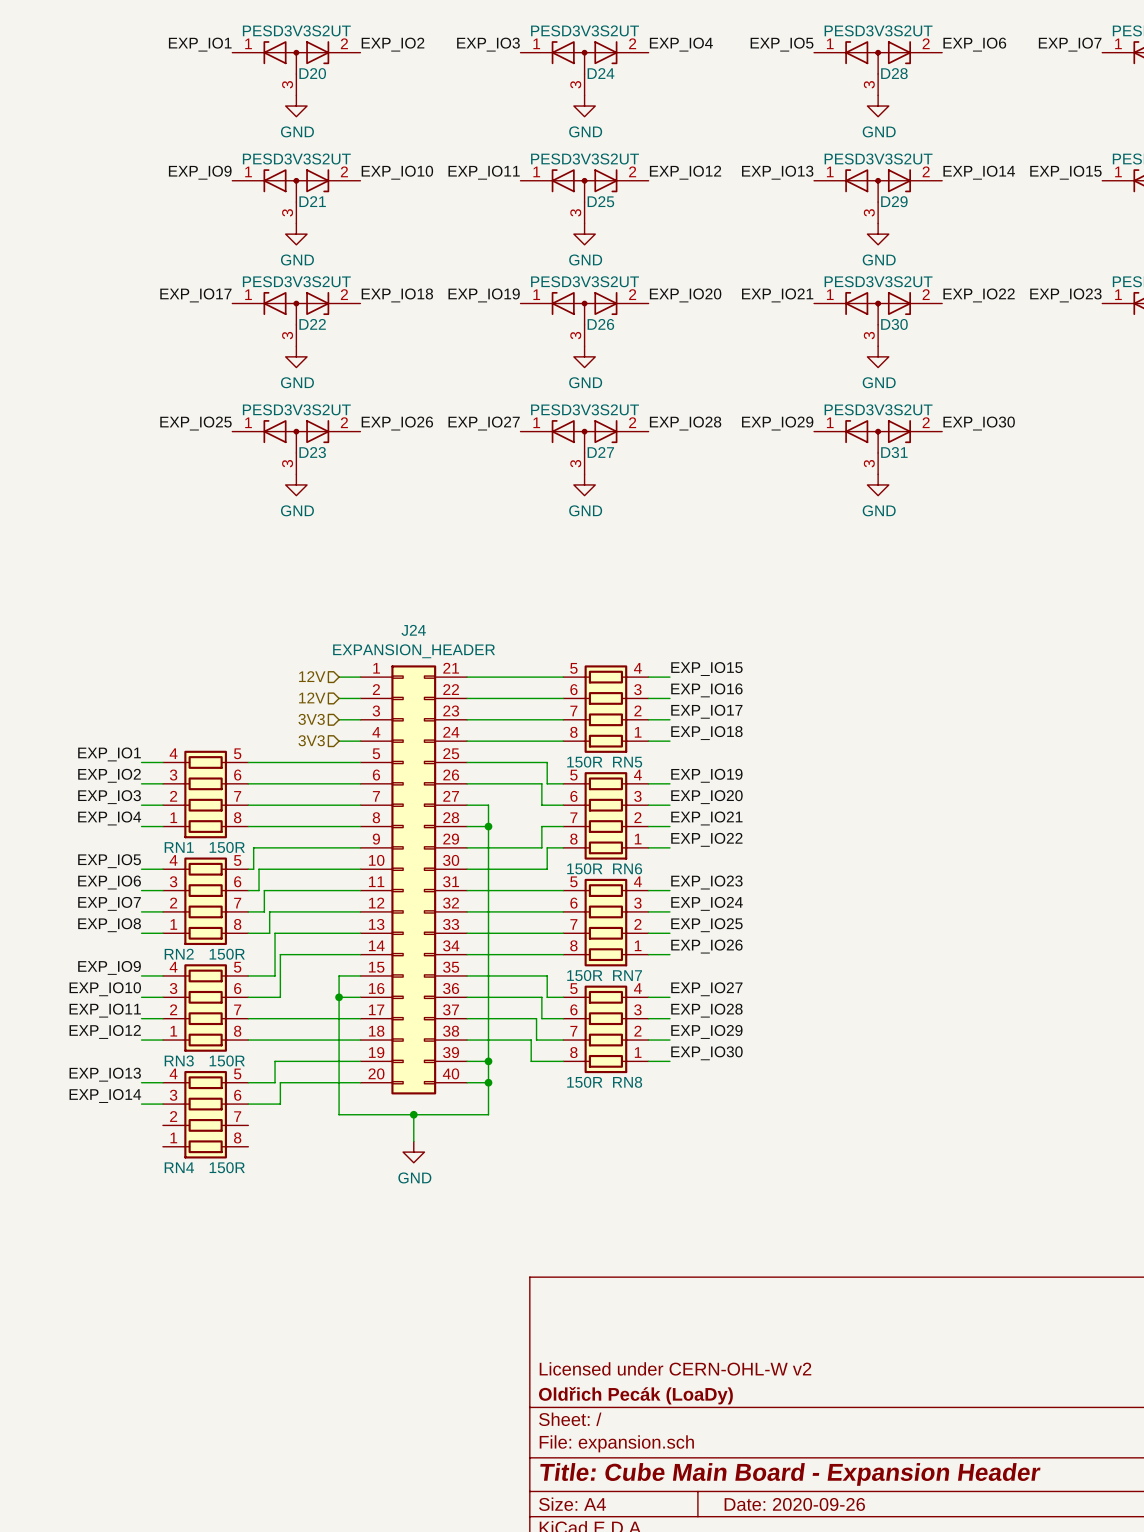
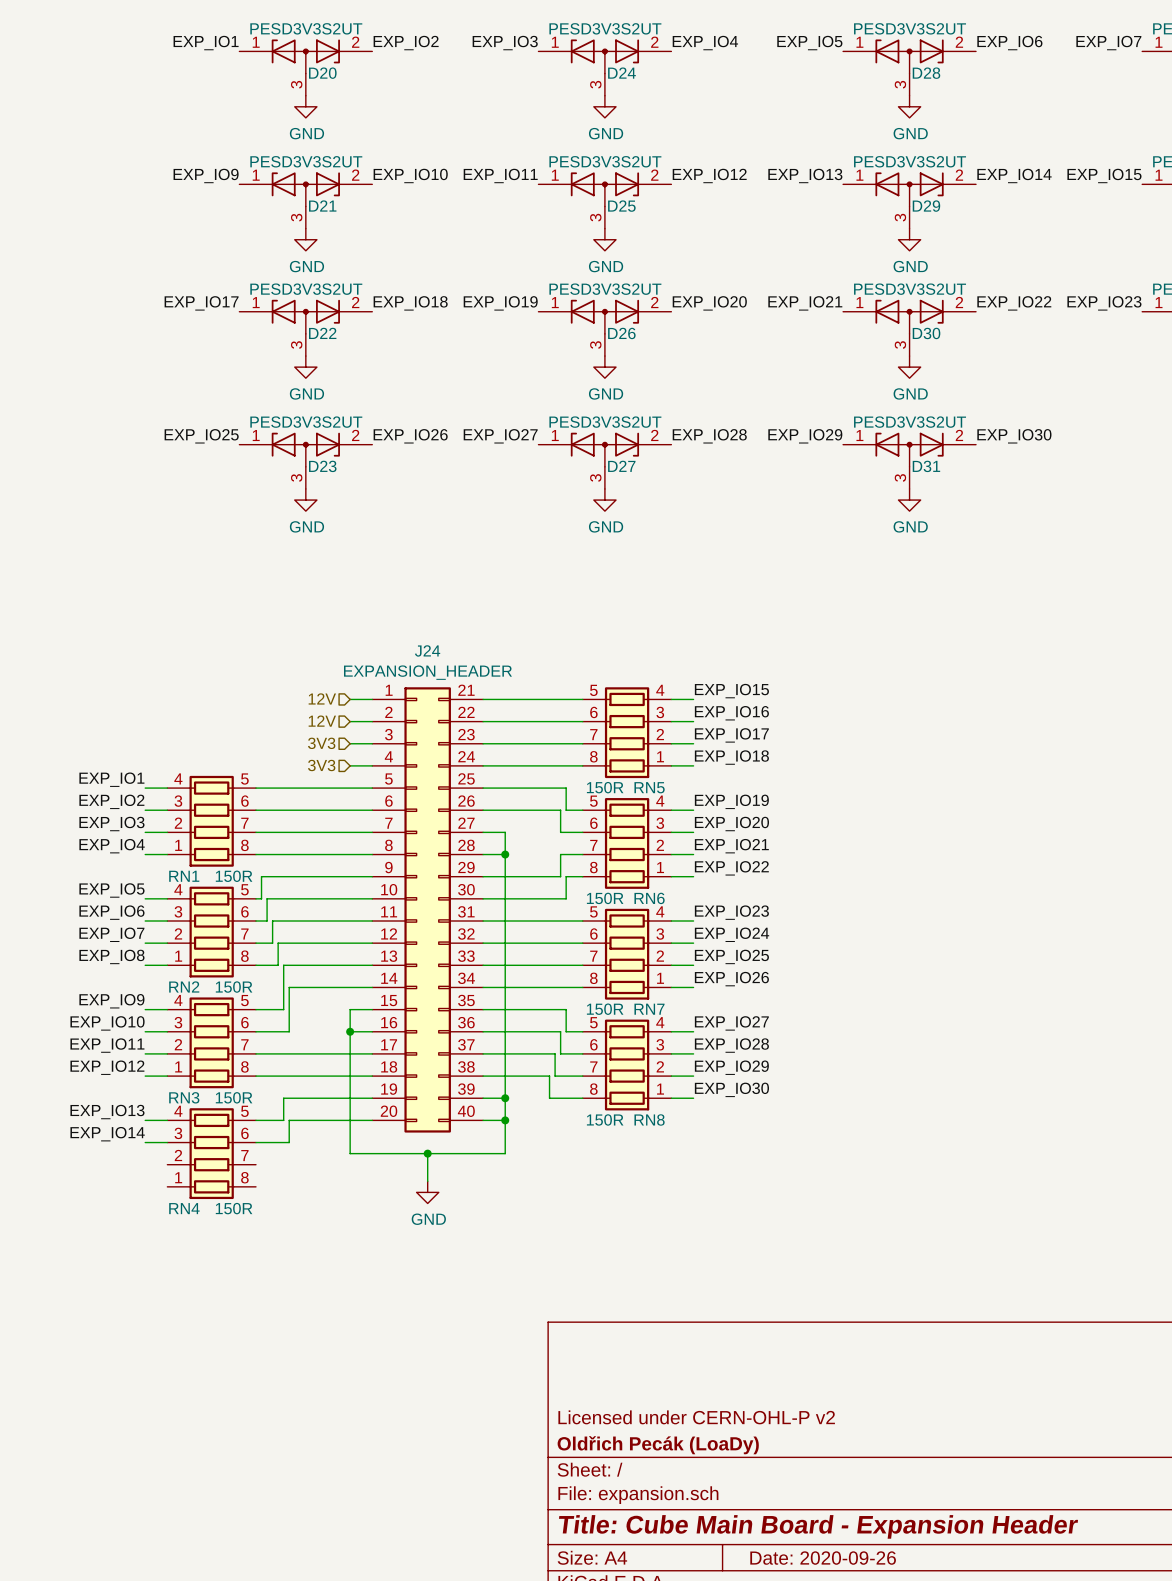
title block: Licensed under CERN-OHL-W v2 (675, 1368) -> Licensed under CERN-OHL-P v2 (696, 1417)

